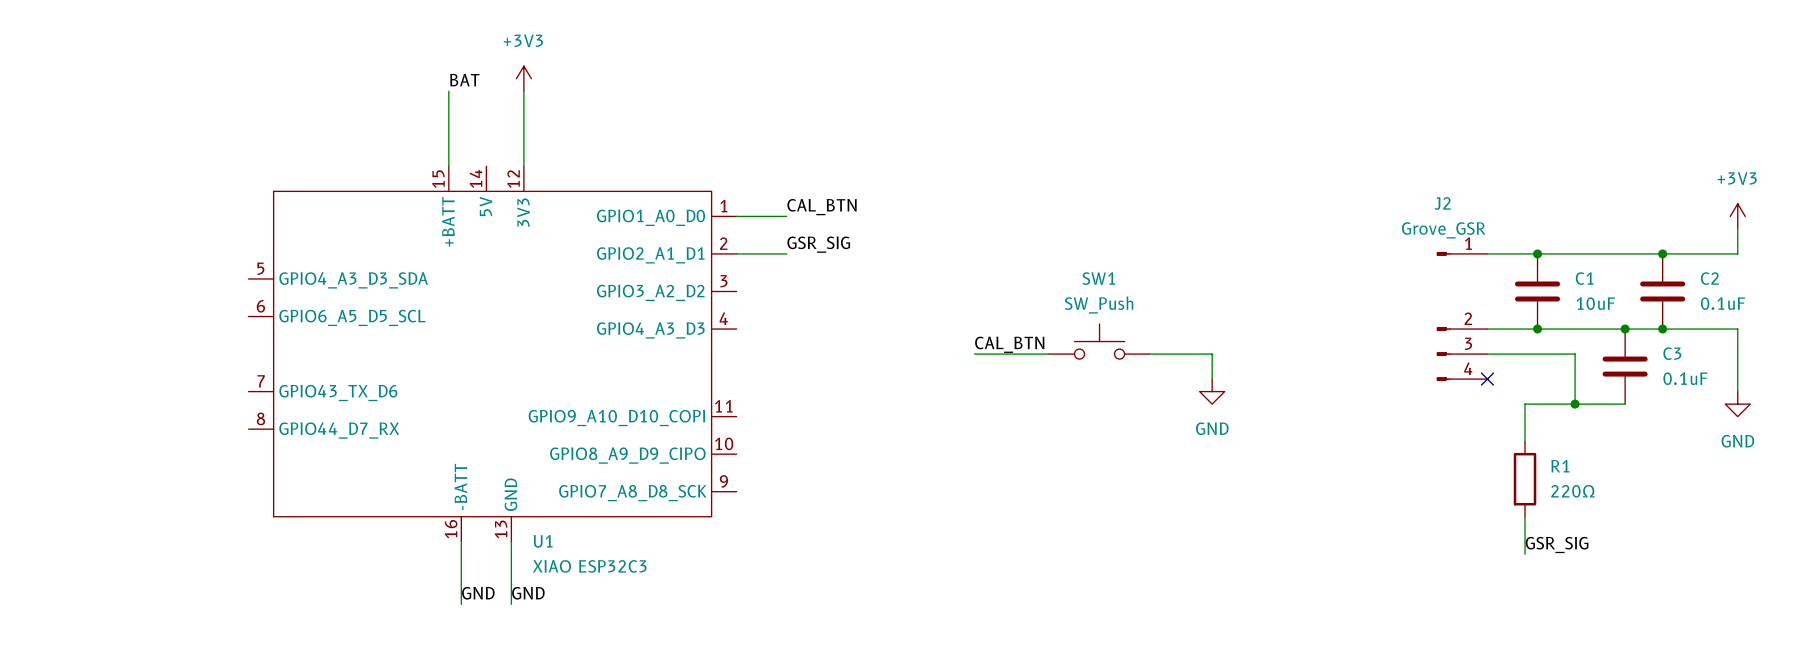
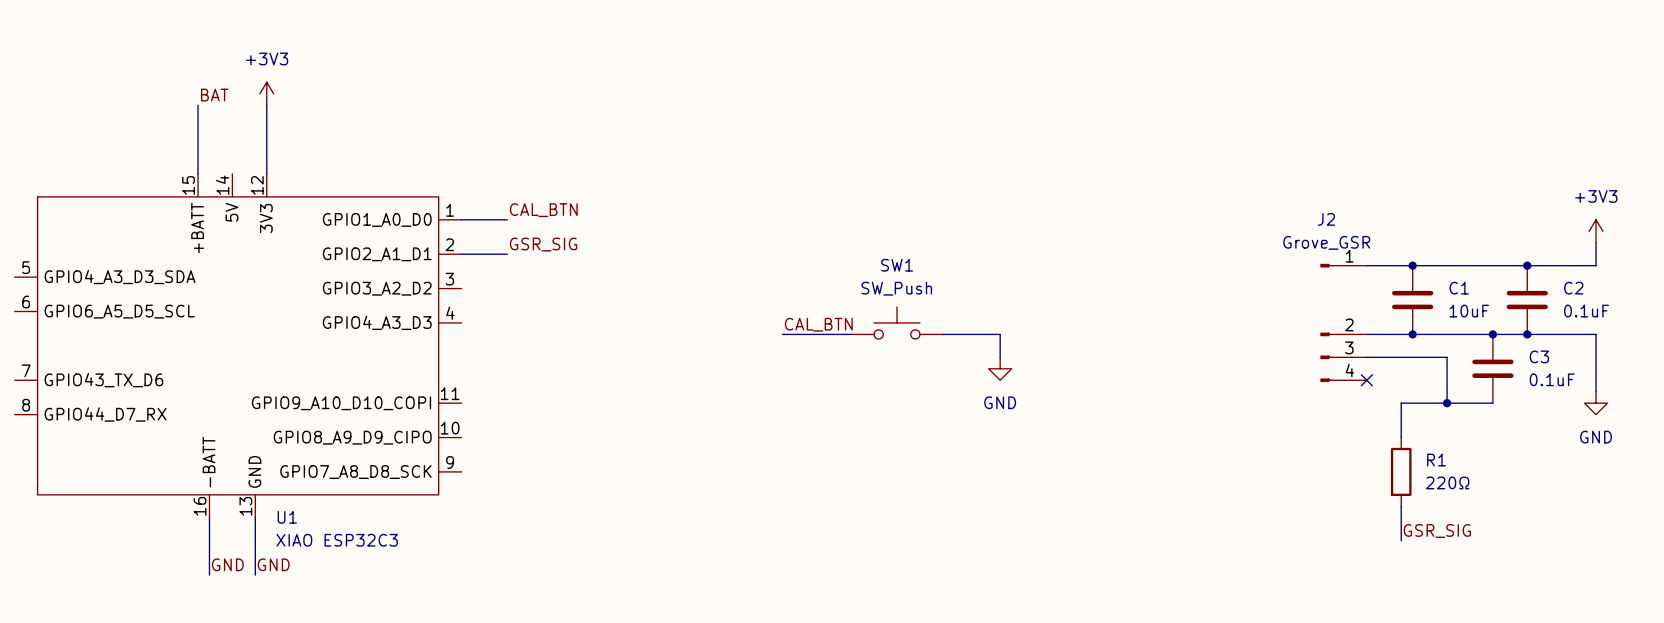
power symbol position: +3V3 (523, 78) -> +3V3 (266, 93)
label position: BAT (464, 80) -> BAT (214, 95)
wire: (448, 91) (448, 166) -> (198, 105) (198, 173)
wire: (523, 91) (523, 166) -> (266, 105) (266, 173)
label: none -> CAL_BTN (543, 210)
label: CAL_BTN (822, 207) -> none
wire: (736, 216) (786, 216) -> (461, 219) (507, 219)
label position: GSR_SIG (818, 244) -> GSR_SIG (543, 244)
wire: (736, 253) (786, 253) -> (461, 254) (507, 254)
label: none -> CAL_BTN (818, 324)
SW1 position: (1099, 341) -> (897, 322)
label: CAL_BTN (1009, 344) -> none
U1 position: (492, 354) -> (238, 345)
wire: (974, 354) (1049, 354) -> (782, 334) (851, 334)
wire: (1149, 354) (1212, 354) (1212, 379) -> (942, 334) (1000, 334) (1000, 357)
power symbol position: GND (1212, 391) -> GND (1000, 368)
wire: (461, 541) (461, 604) -> (209, 517) (209, 575)
wire: (511, 541) (511, 604) -> (255, 517) (255, 575)
label: none -> GND (227, 564)
label: none -> GND (273, 564)
label: GND (478, 593) -> none
label: GND (528, 593) -> none

